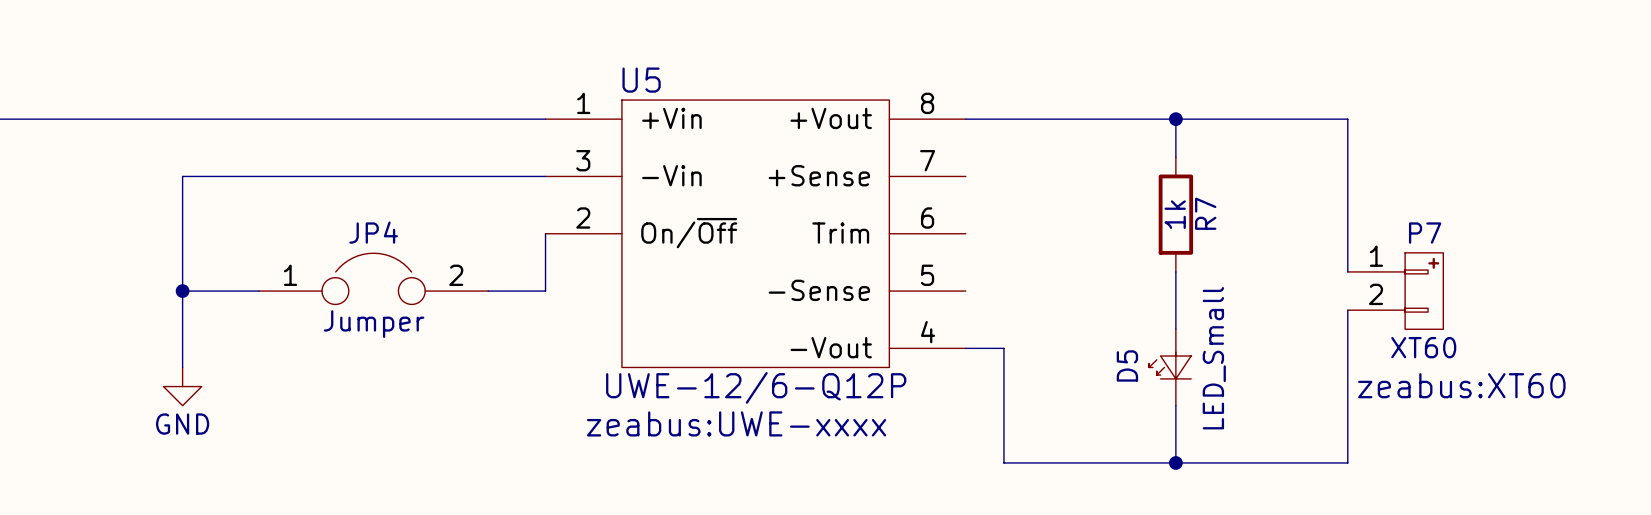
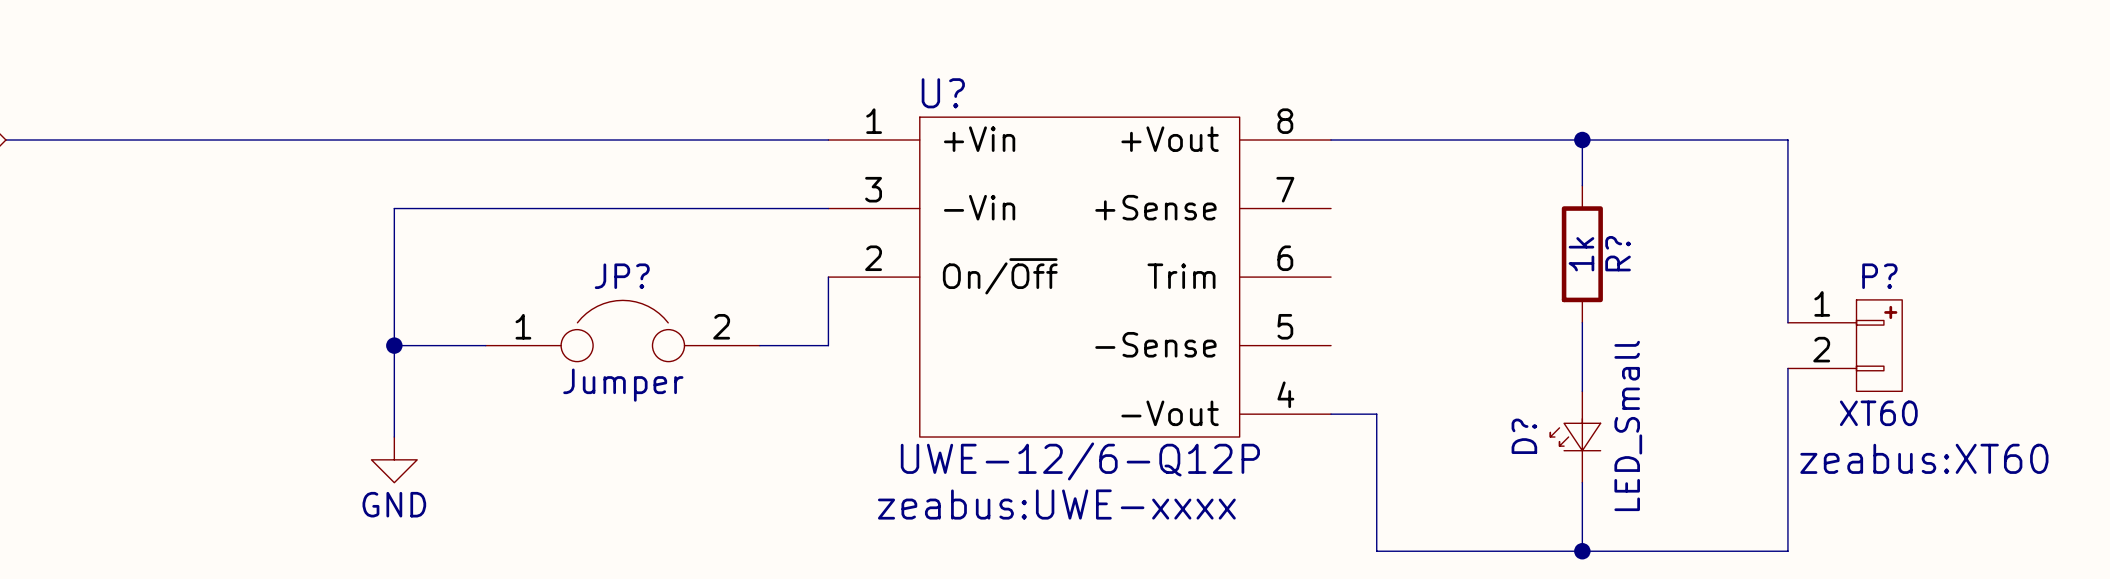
U5 name: U5 (641, 80) -> U? (943, 93)
R7 name: R7 (1205, 213) -> R? (1618, 253)
JP4 name: JP4 (373, 232) -> JP? (622, 276)
P7 name: P7 (1425, 233) -> P? (1879, 276)
D5 name: D5 (1127, 365) -> D? (1524, 436)

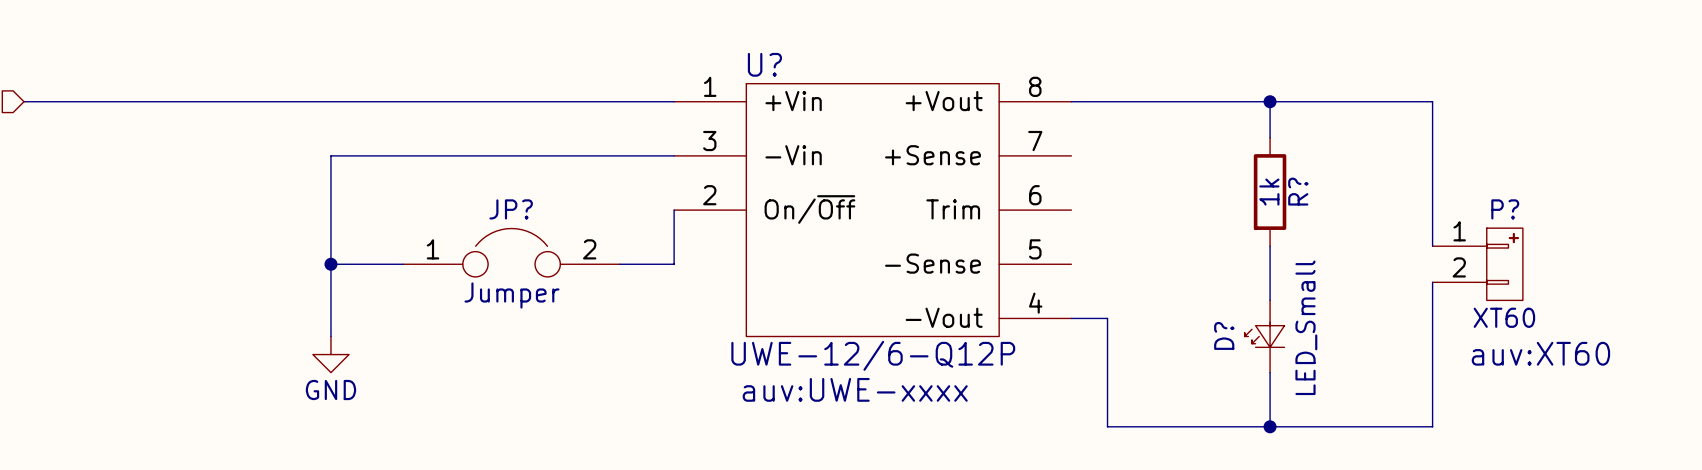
P? text: zeabus:XT60 (1924, 458) -> auv:XT60 (1540, 353)
U? text: zeabus:UWE-xxxx (1056, 504) -> auv:UWE-xxxx (855, 389)

